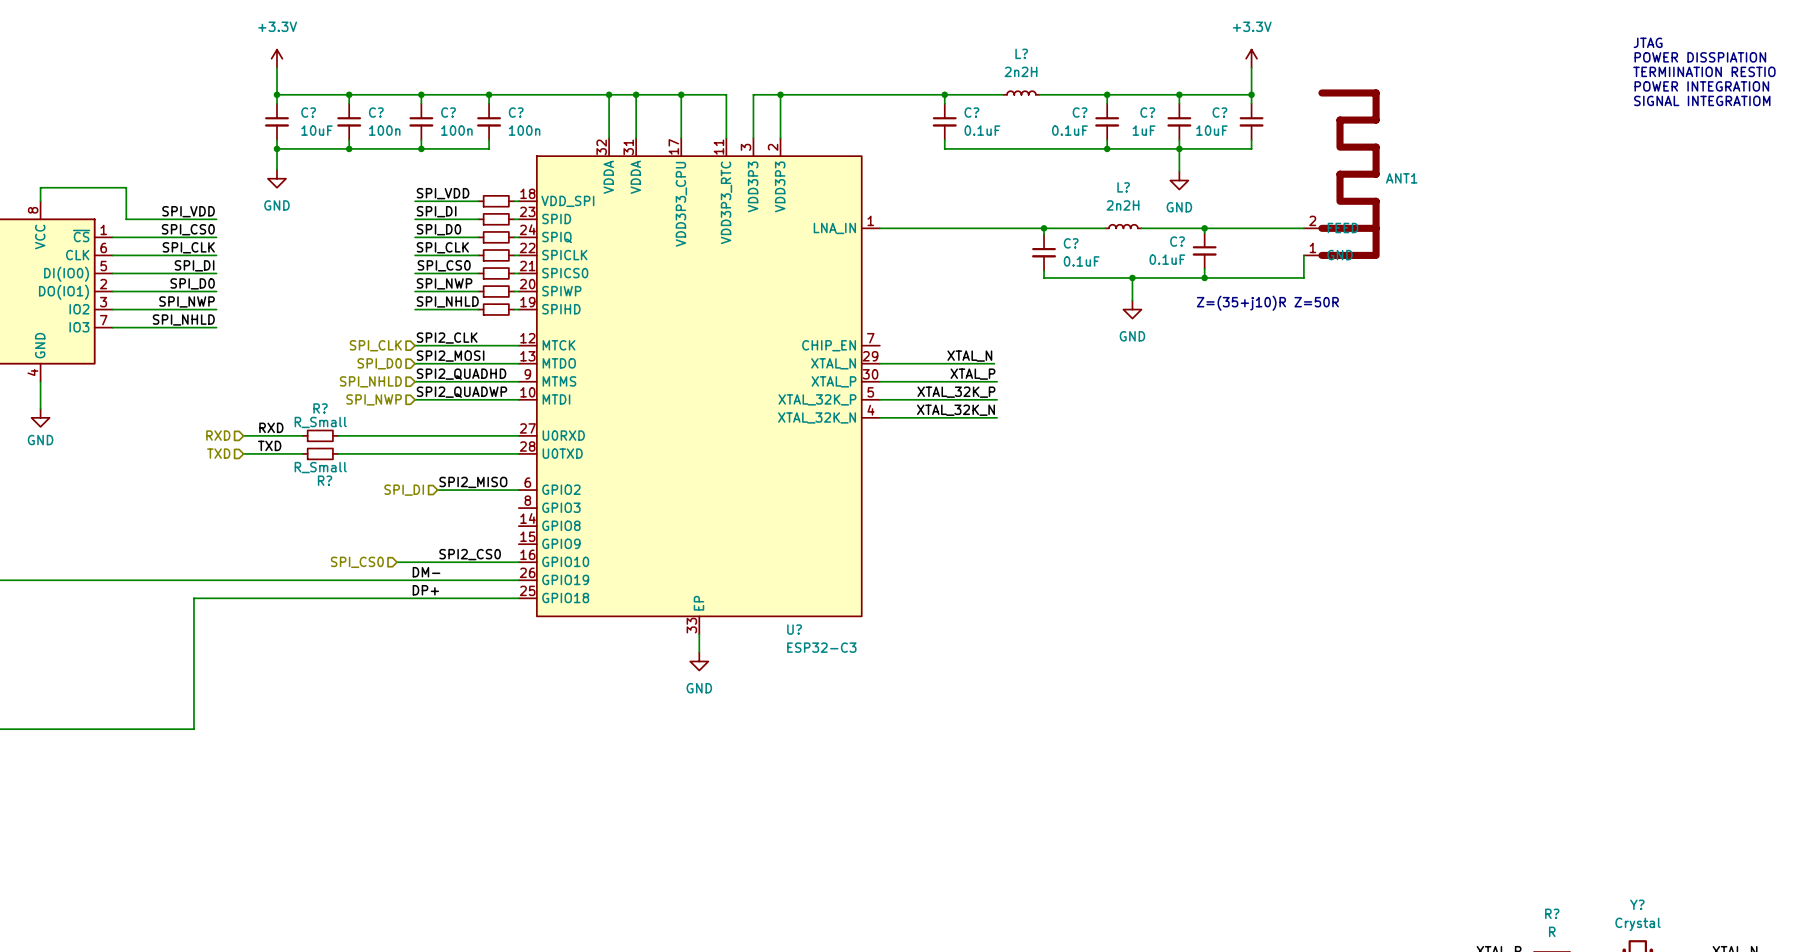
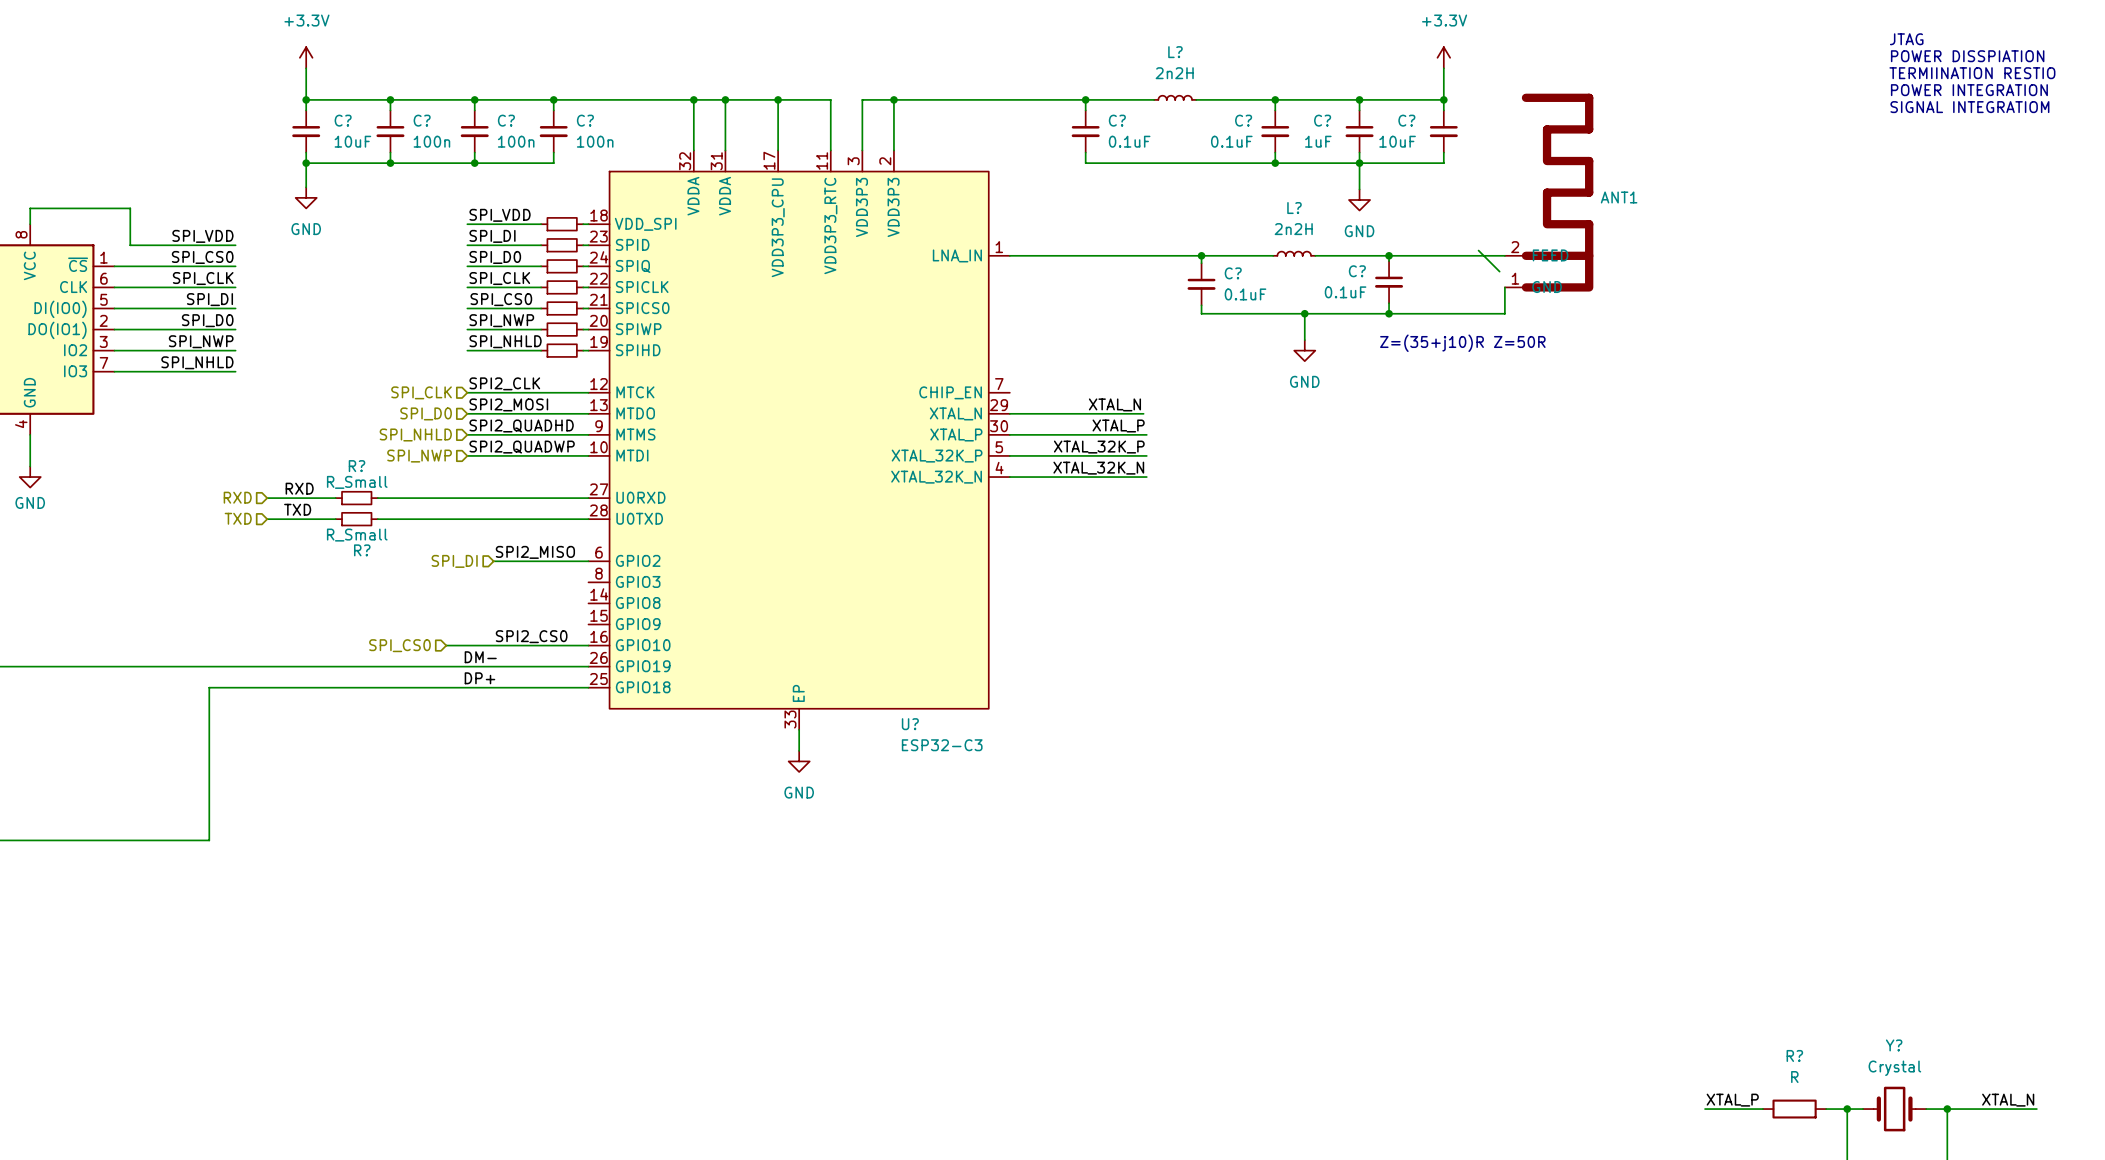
wire: none -> (1478, 250) (1499, 271)

